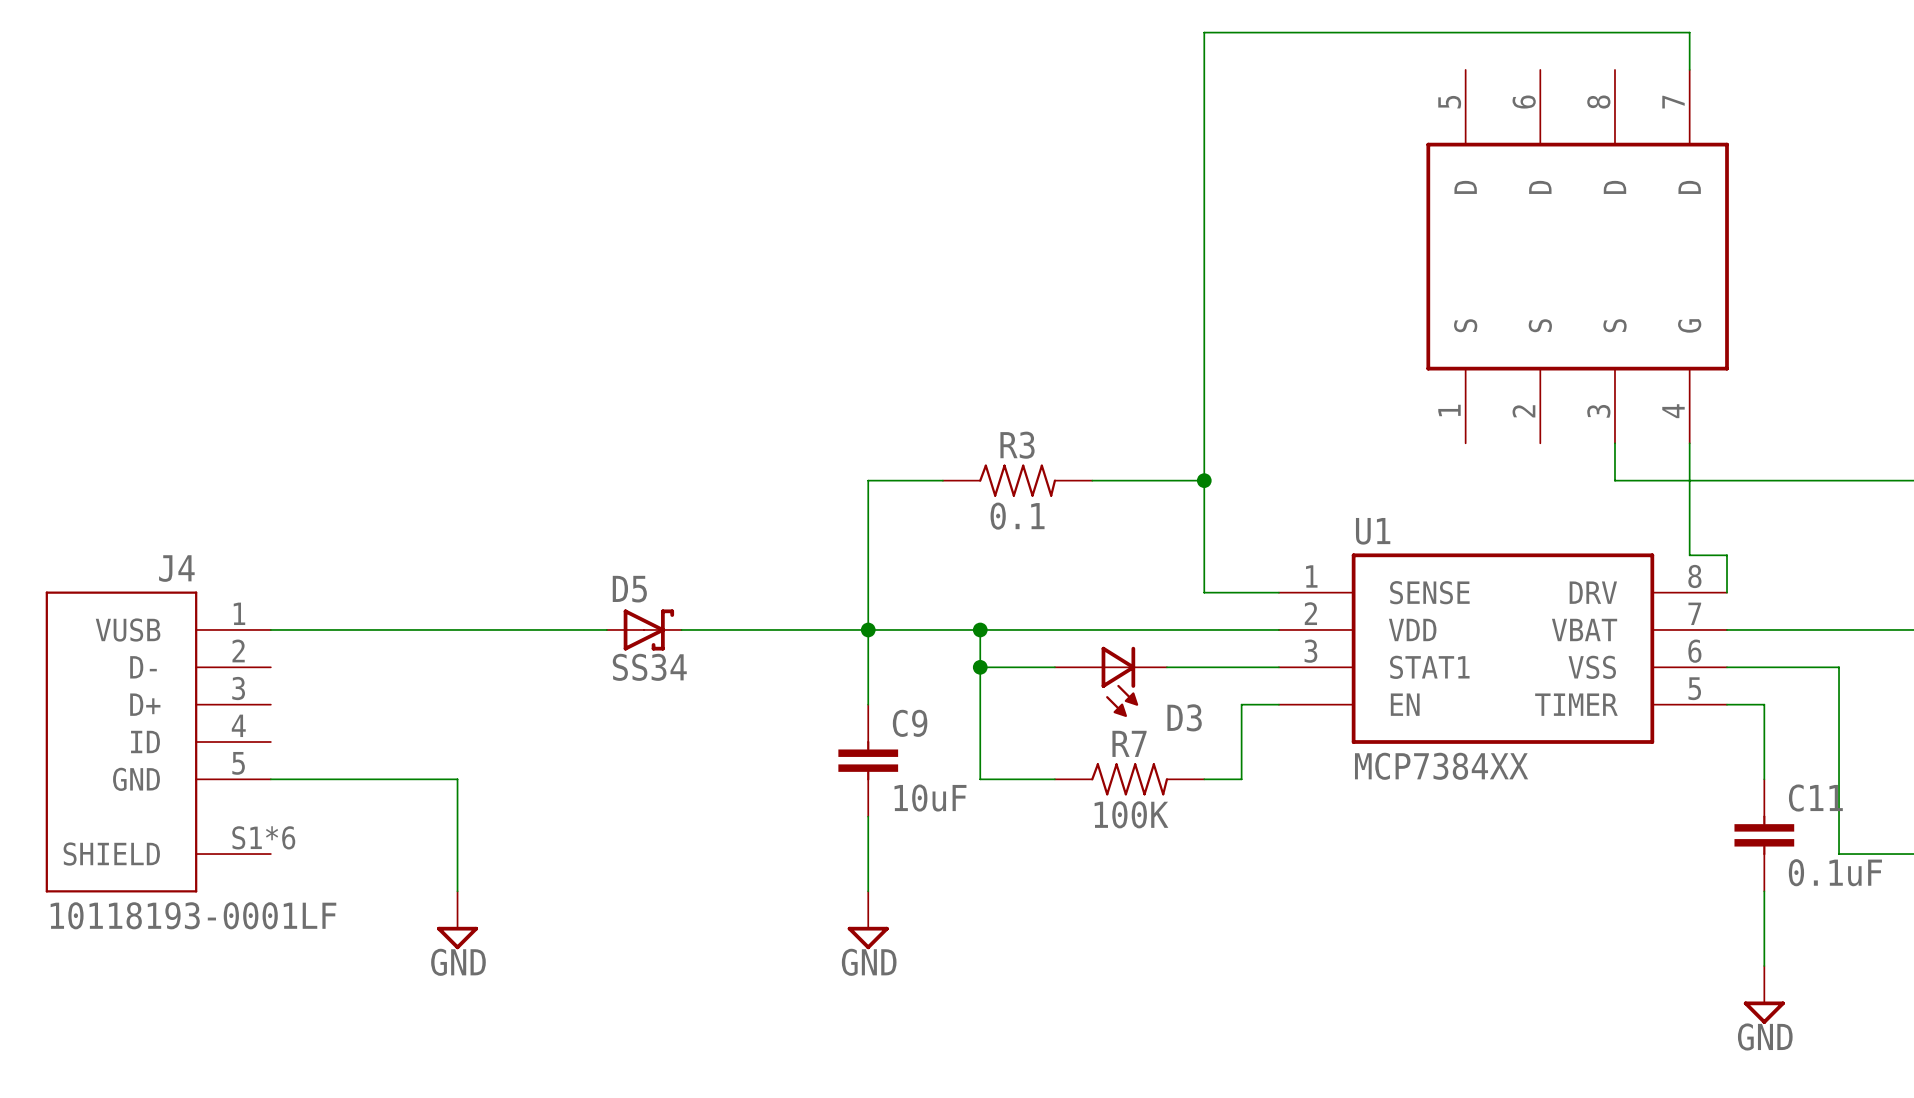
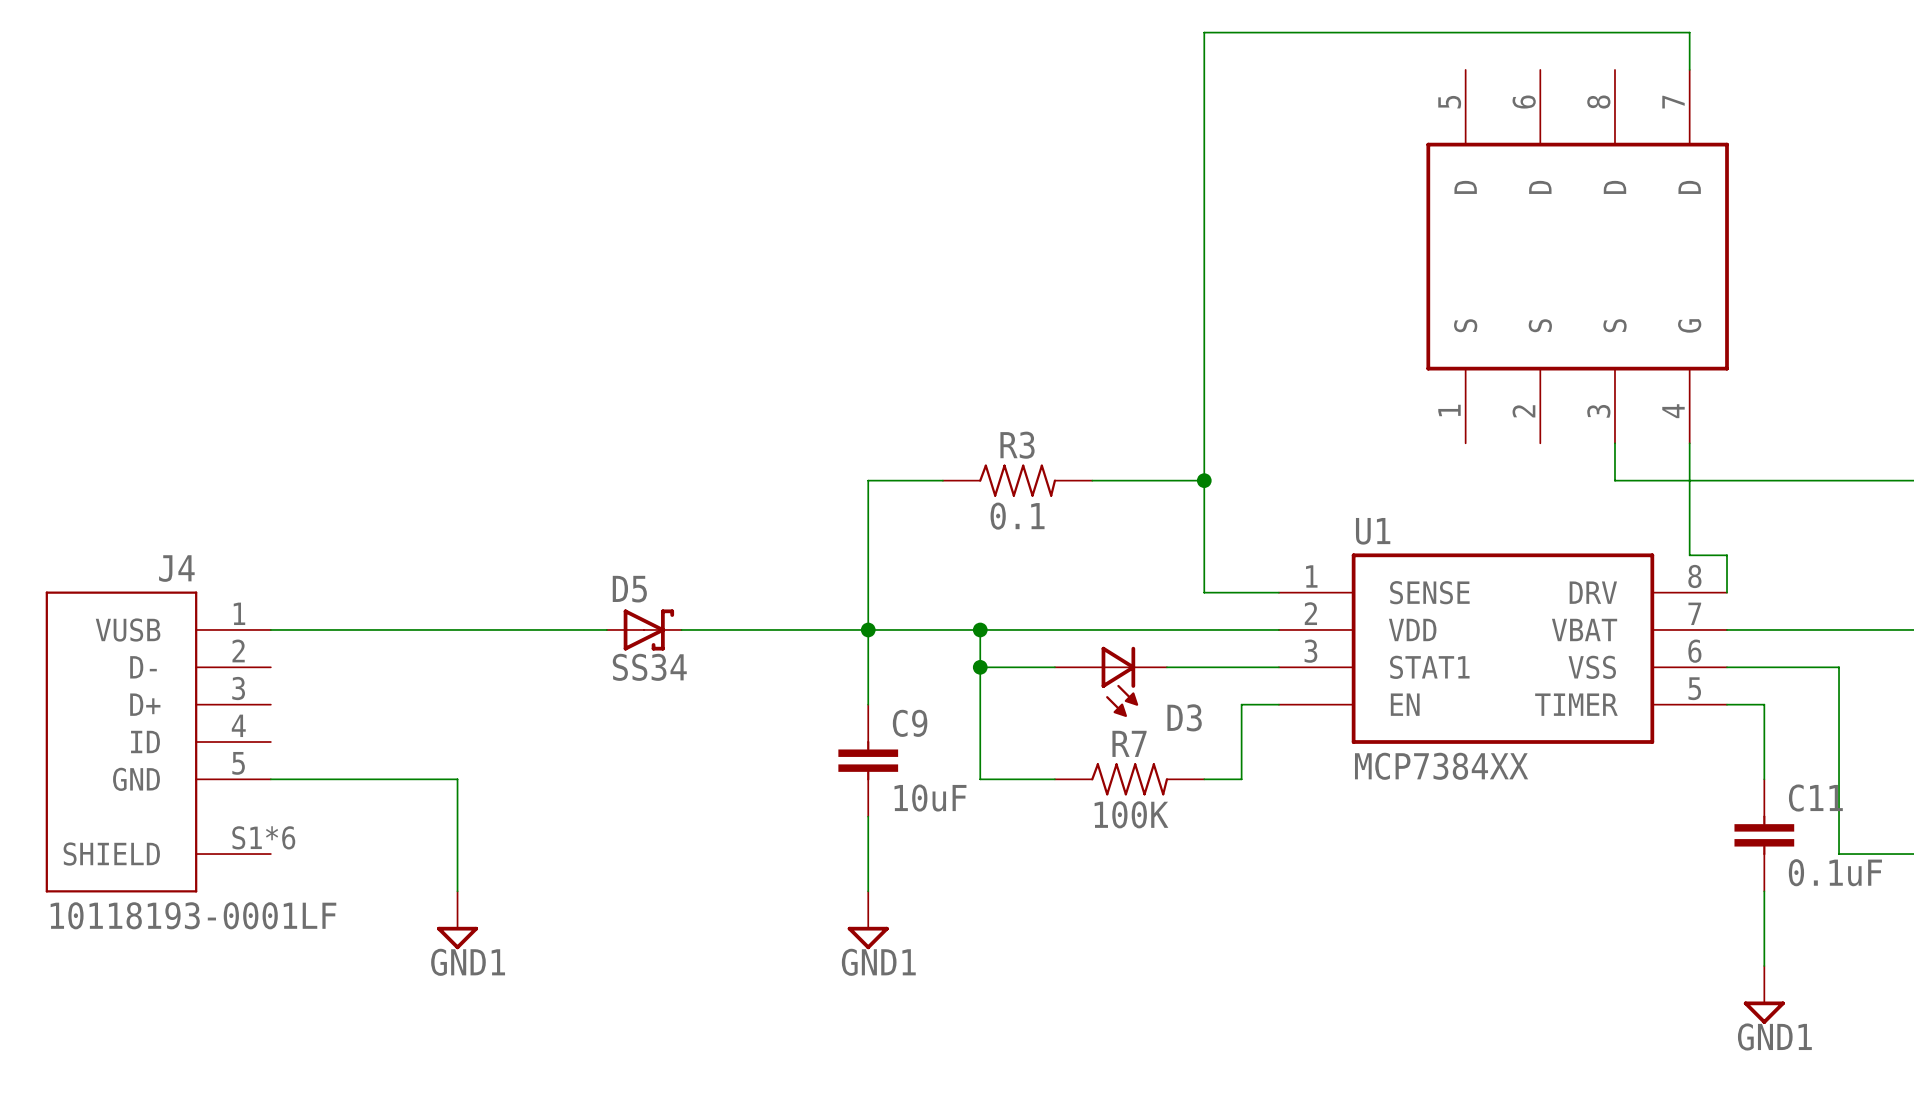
power symbol: GND (457, 920) -> GND1 (457, 920)
power symbol: GND (868, 920) -> GND1 (868, 920)
power symbol: GND (1764, 994) -> GND1 (1764, 994)

